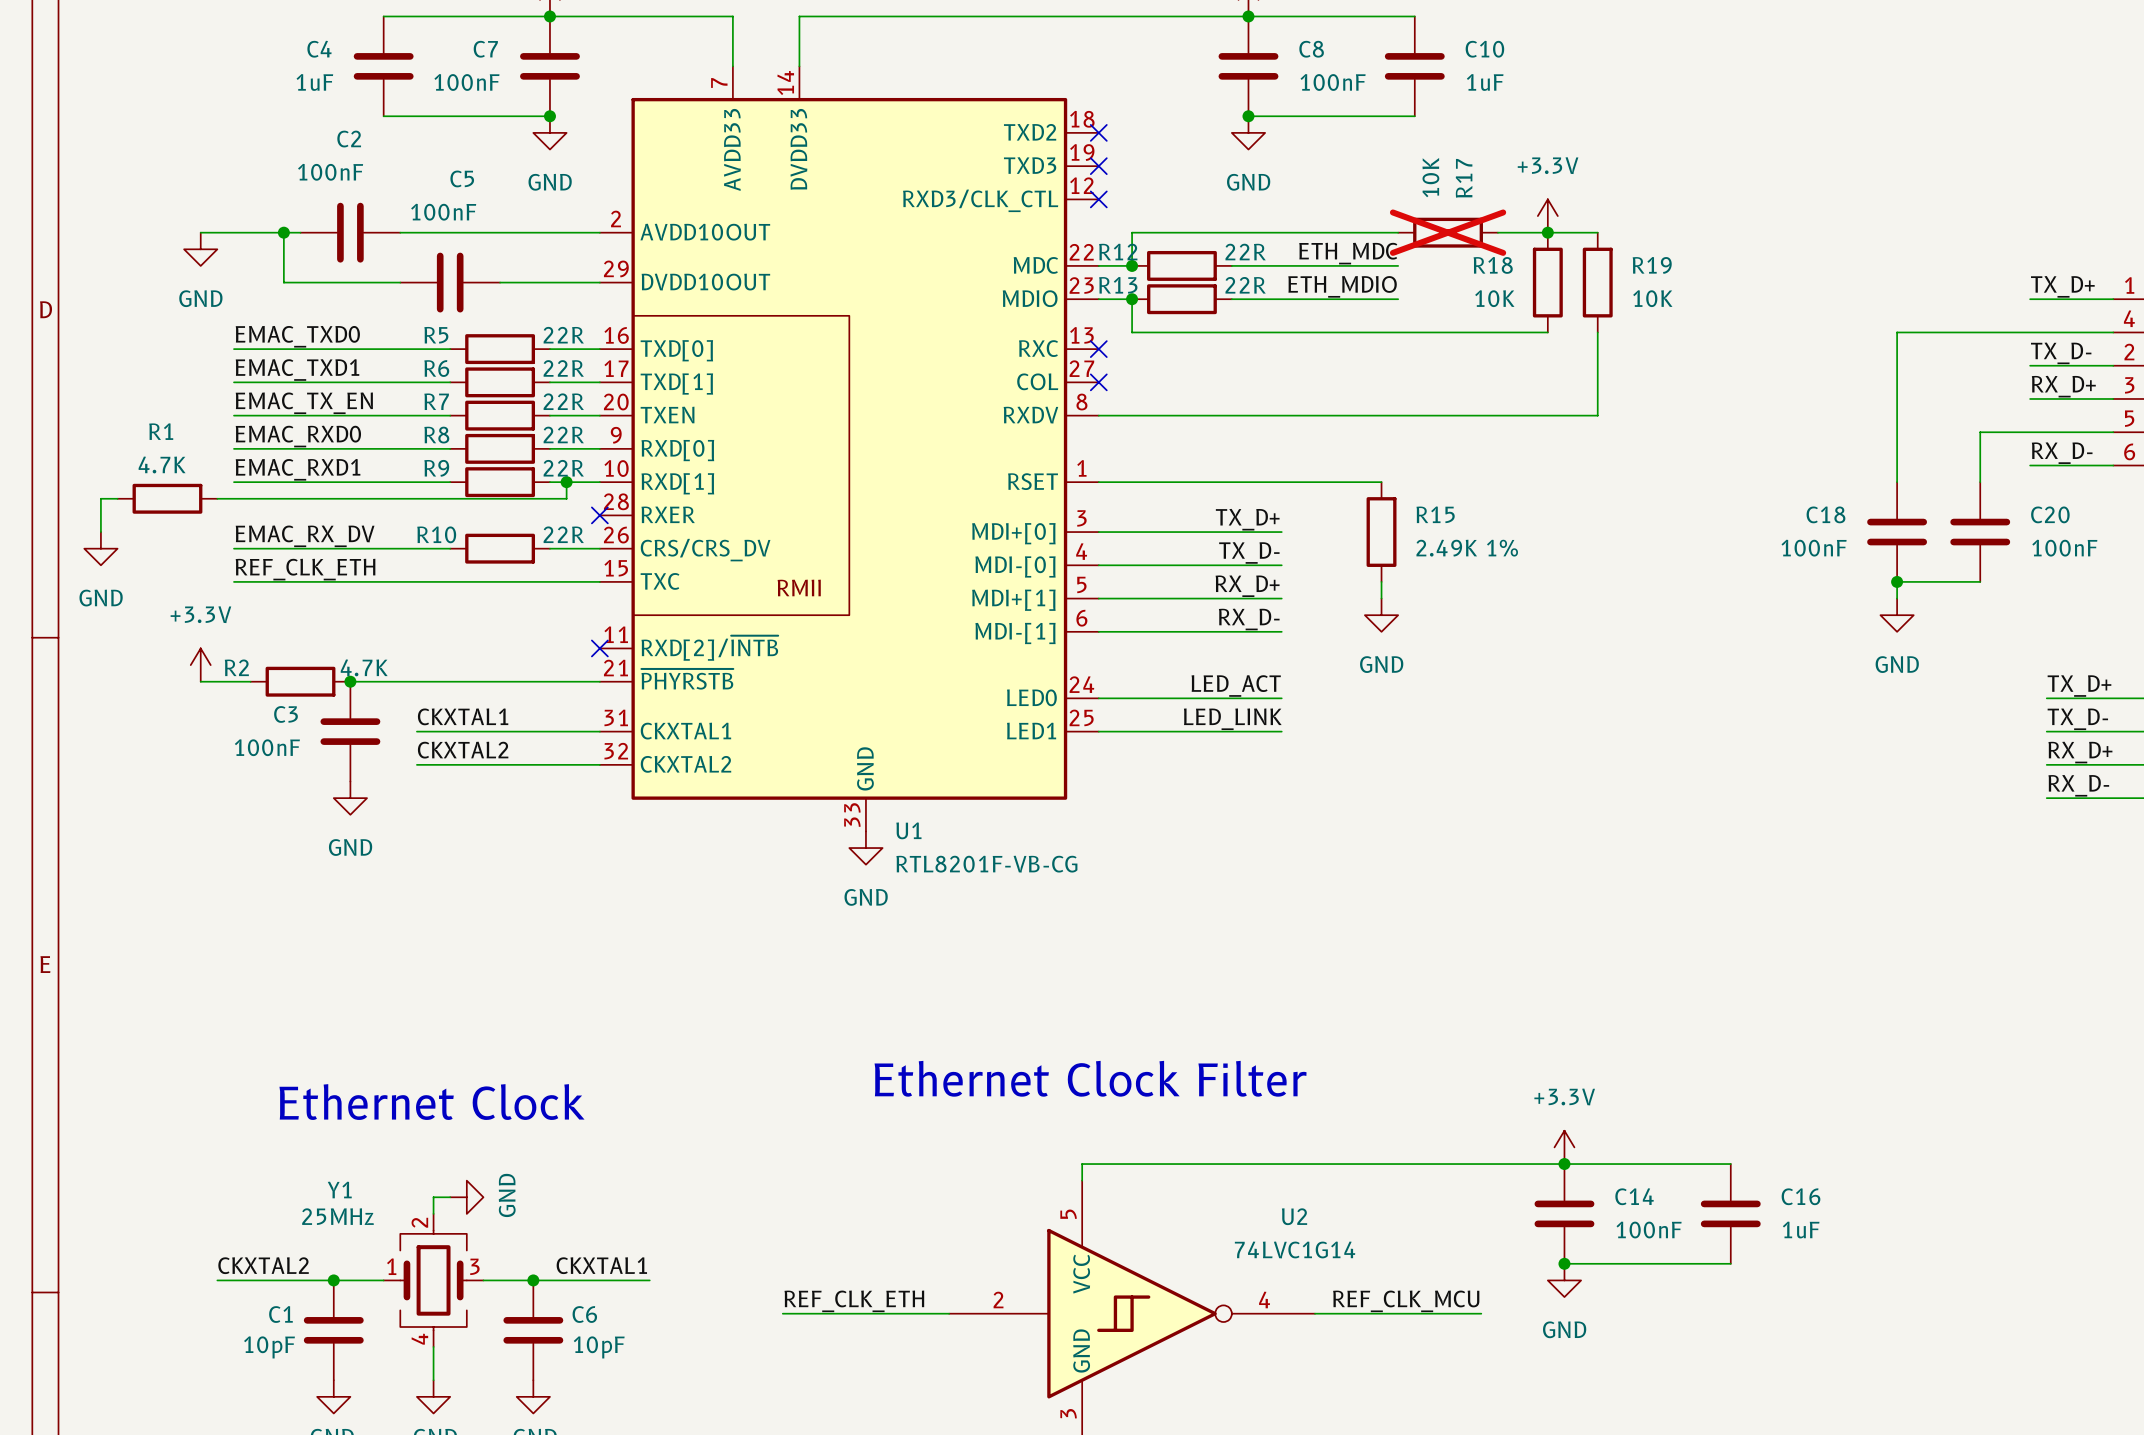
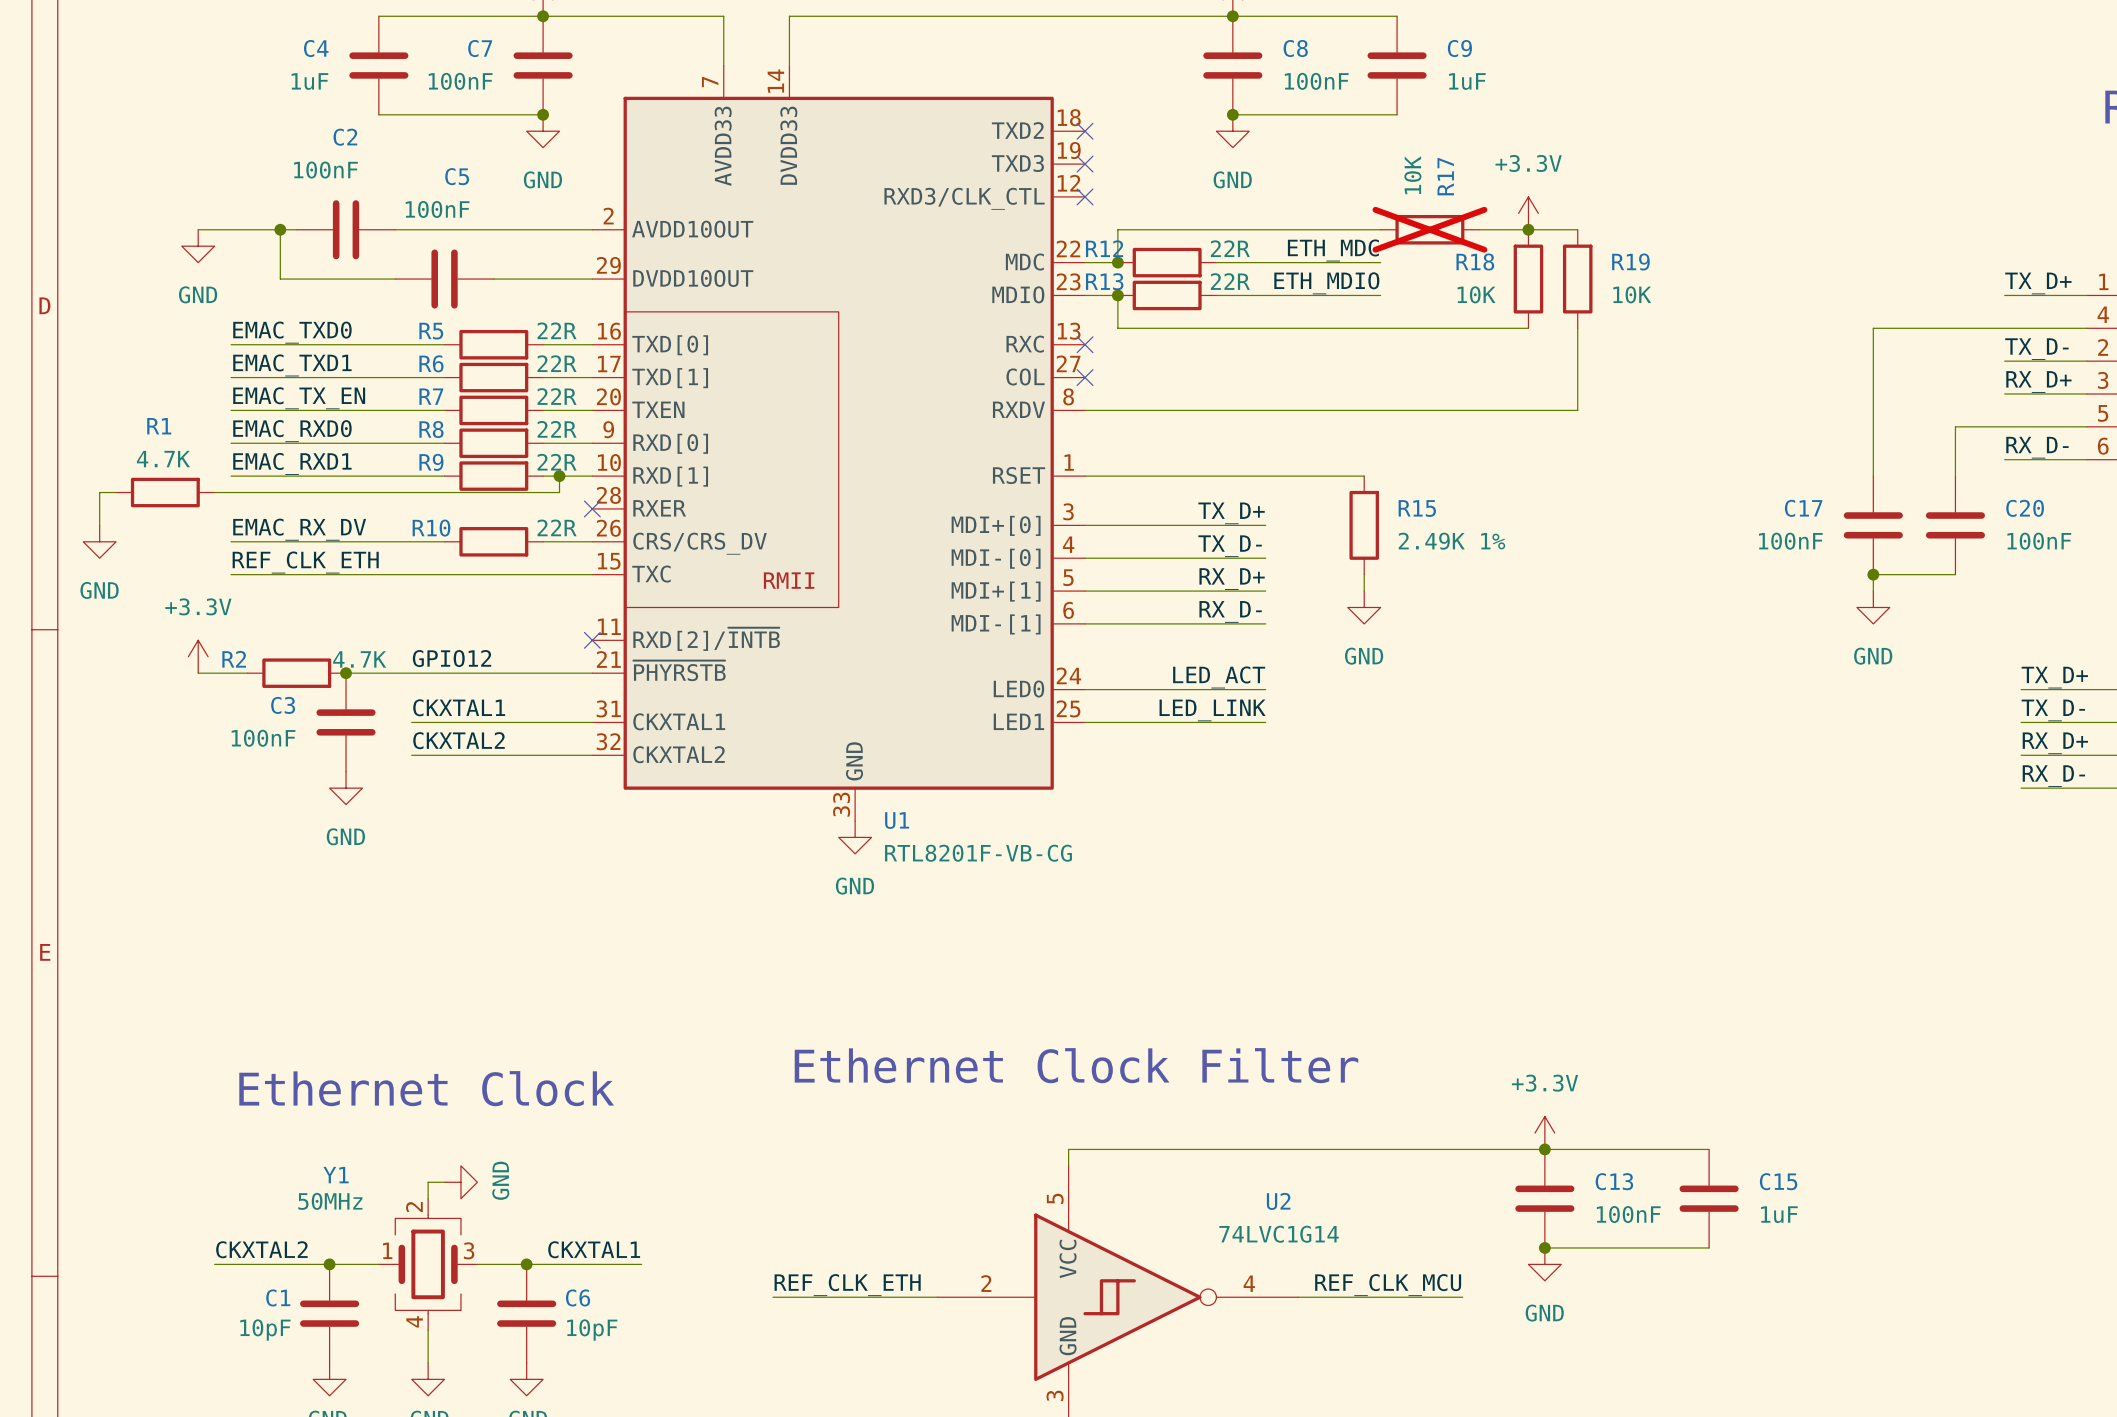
C10 name: C10 (1484, 49) -> C9 (1459, 48)
C18 name: C18 (1825, 514) -> C17 (1803, 508)
label: none -> GPIO12 (451, 658)
C14 name: C14 (1634, 1196) -> C13 (1614, 1181)
C16 name: C16 (1801, 1196) -> C15 (1778, 1181)
Y1 value: 25MHz (337, 1216) -> 50MHz (330, 1201)

